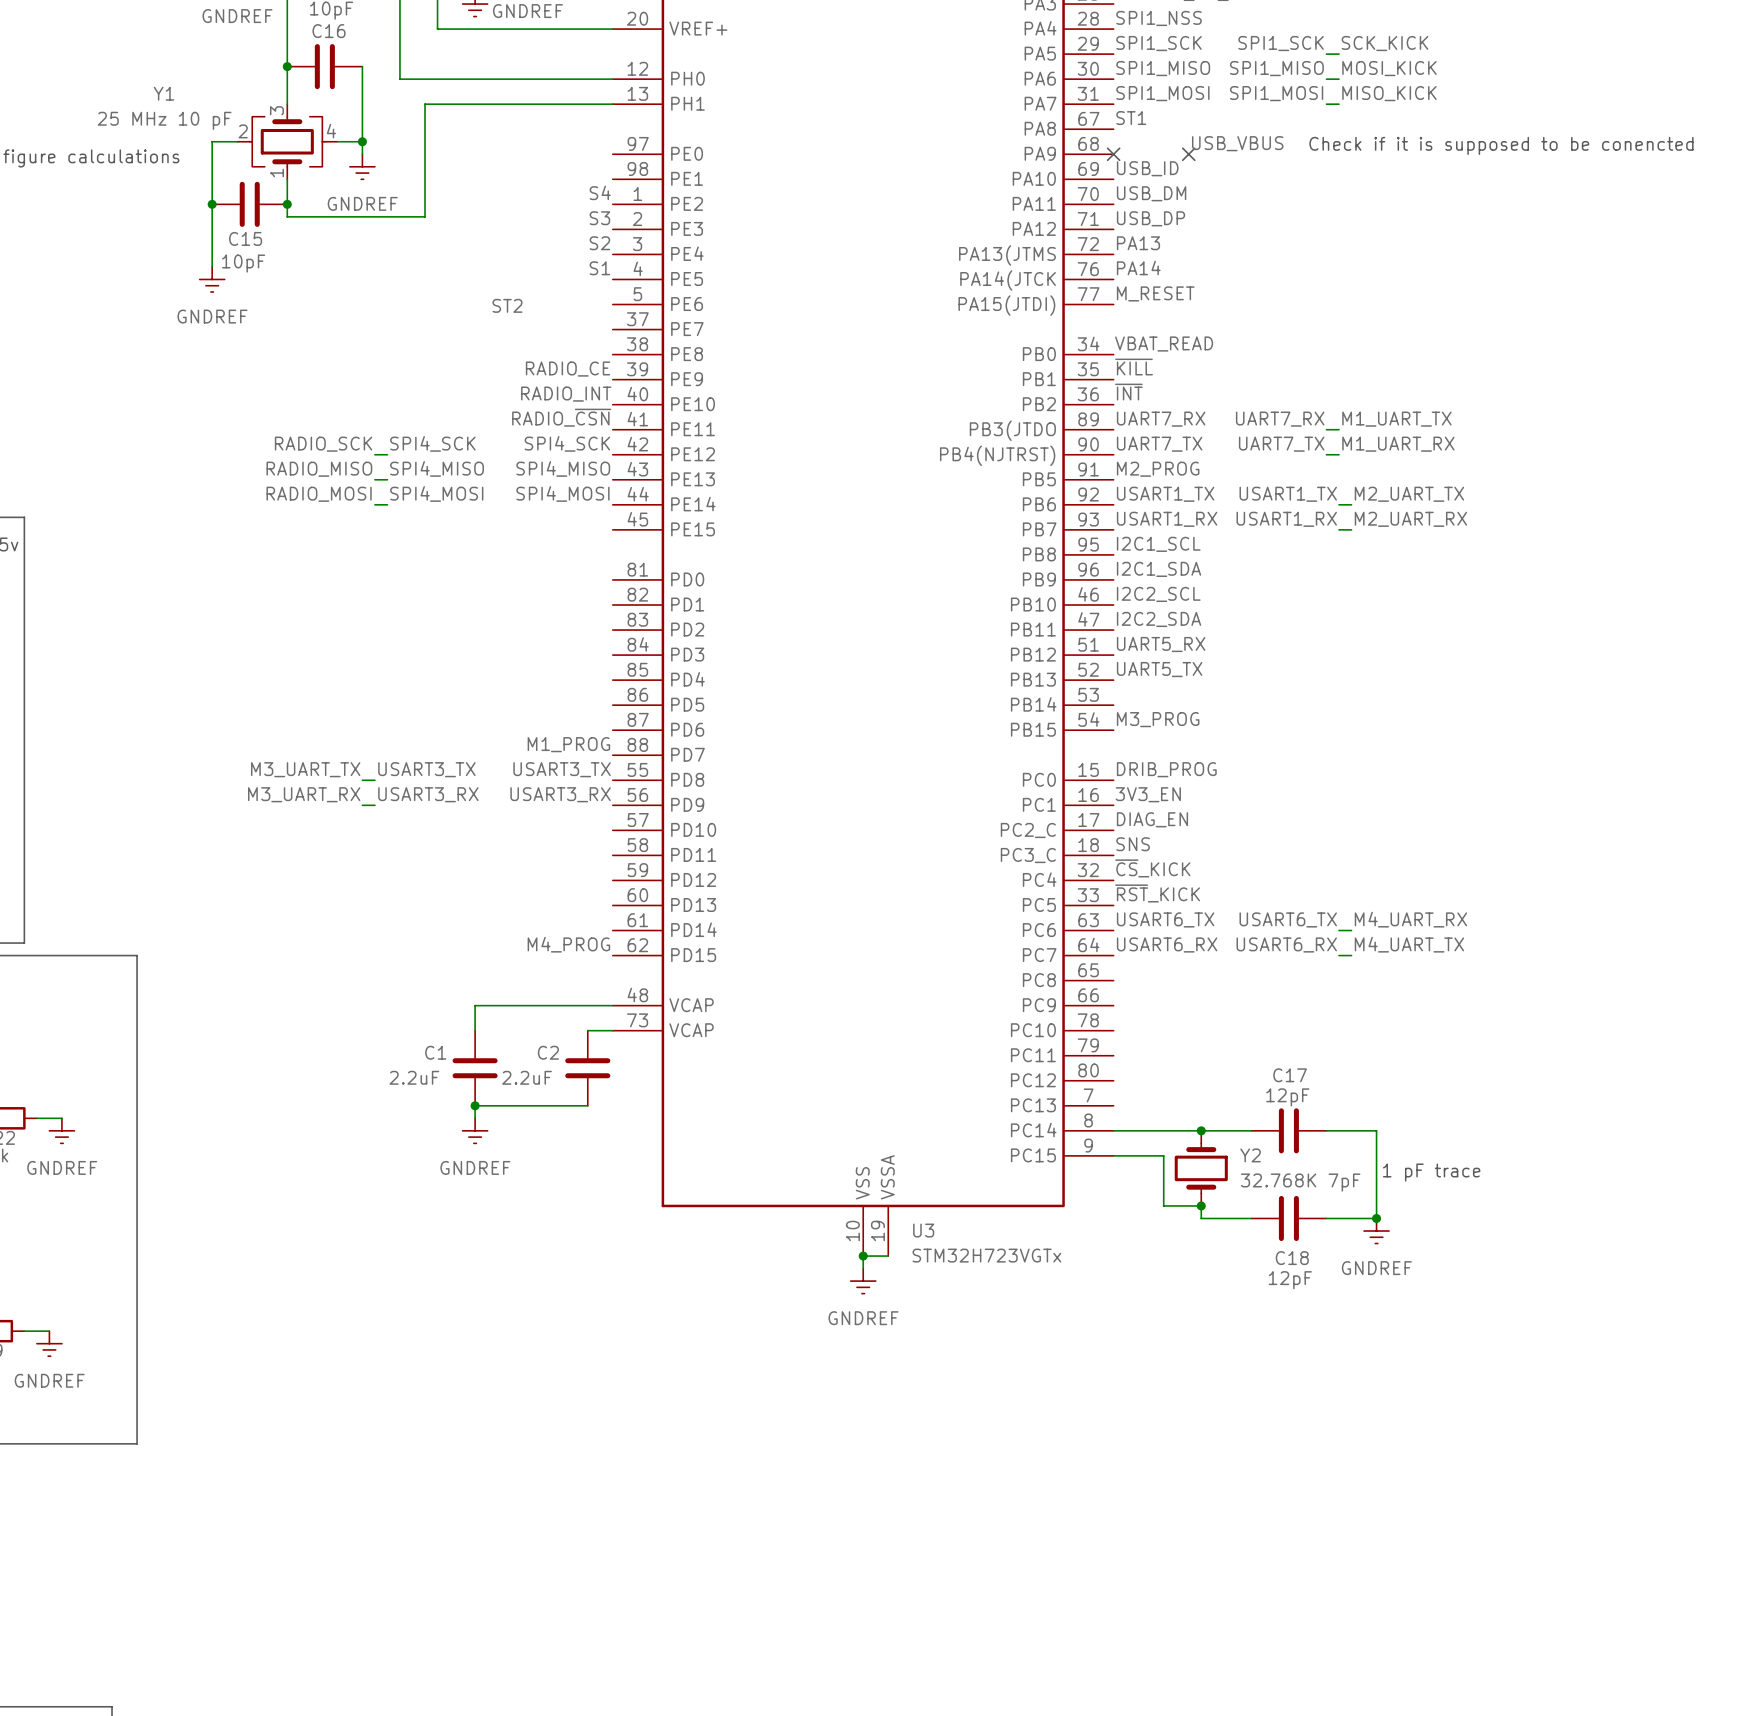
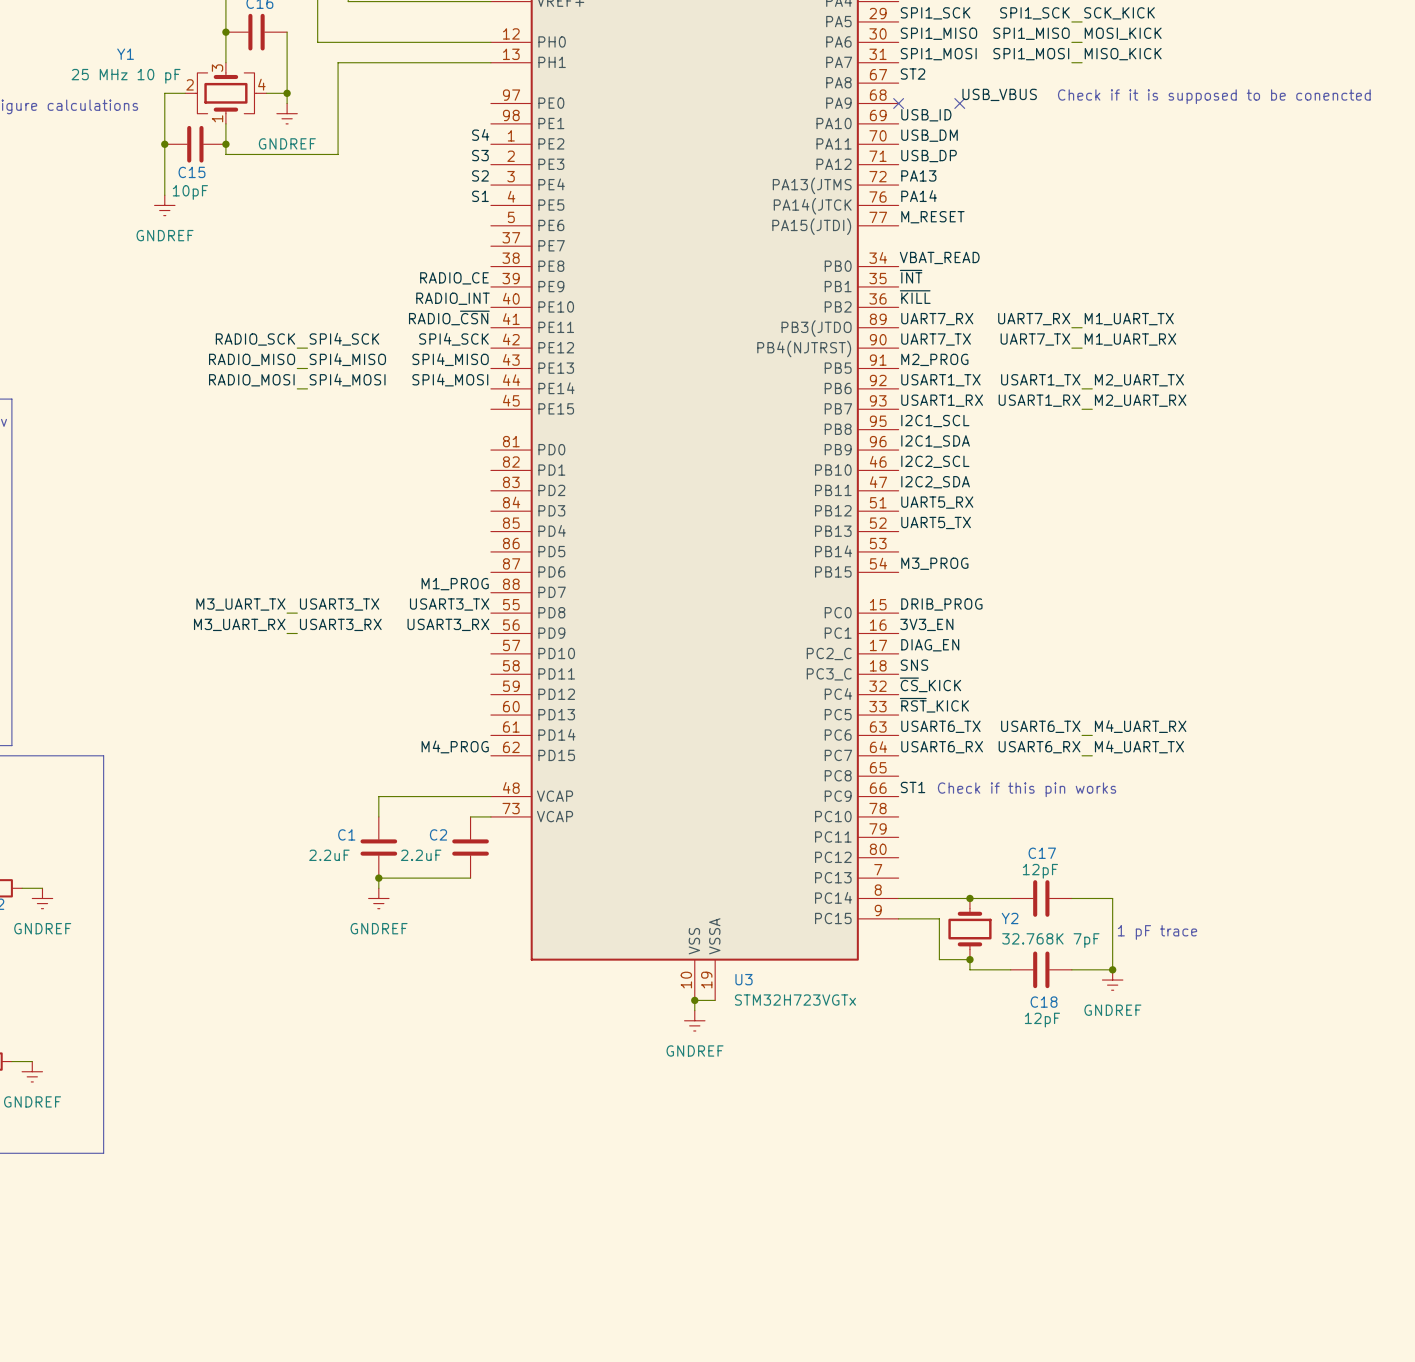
label: ST1 (1131, 118) -> ST2 (913, 74)
label: ST2 (507, 305) -> none
label: ~{KILL} (1134, 367) -> ~{INT} (911, 276)
label: ~{INT} (1128, 392) -> ~{KILL} (915, 297)
label: none -> ST1 (913, 787)
text: none -> Check if this pin works (1027, 789)

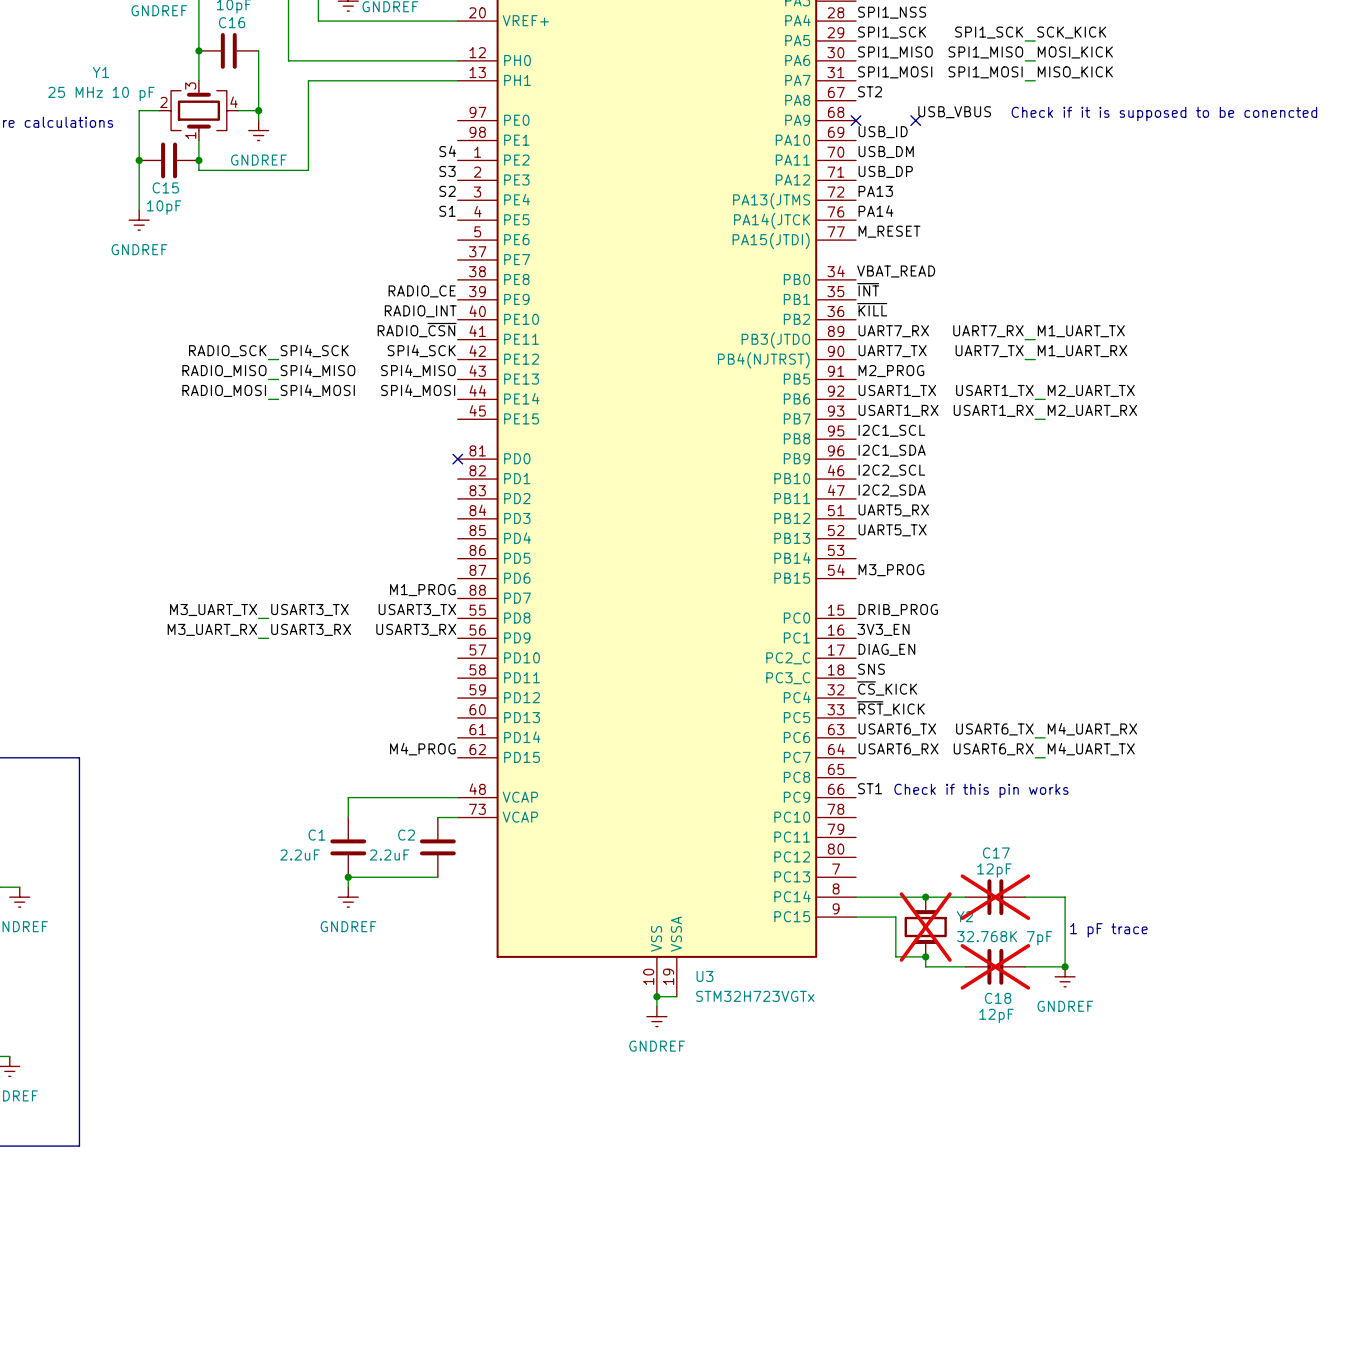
no-connect mark: none -> (457, 459)
C17 do-not-place cross: none -> (995, 897)
Y2 do-not-place cross: none -> (925, 927)
C18 do-not-place cross: none -> (995, 966)

